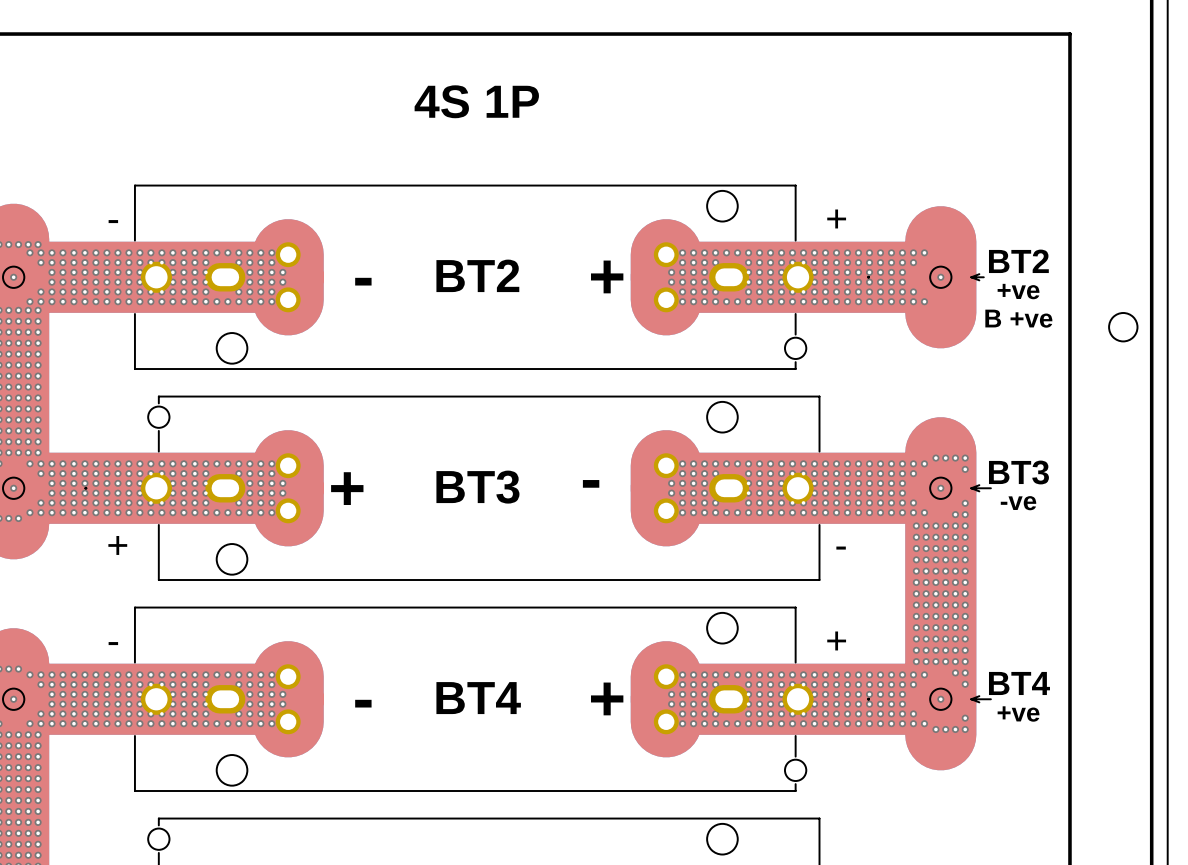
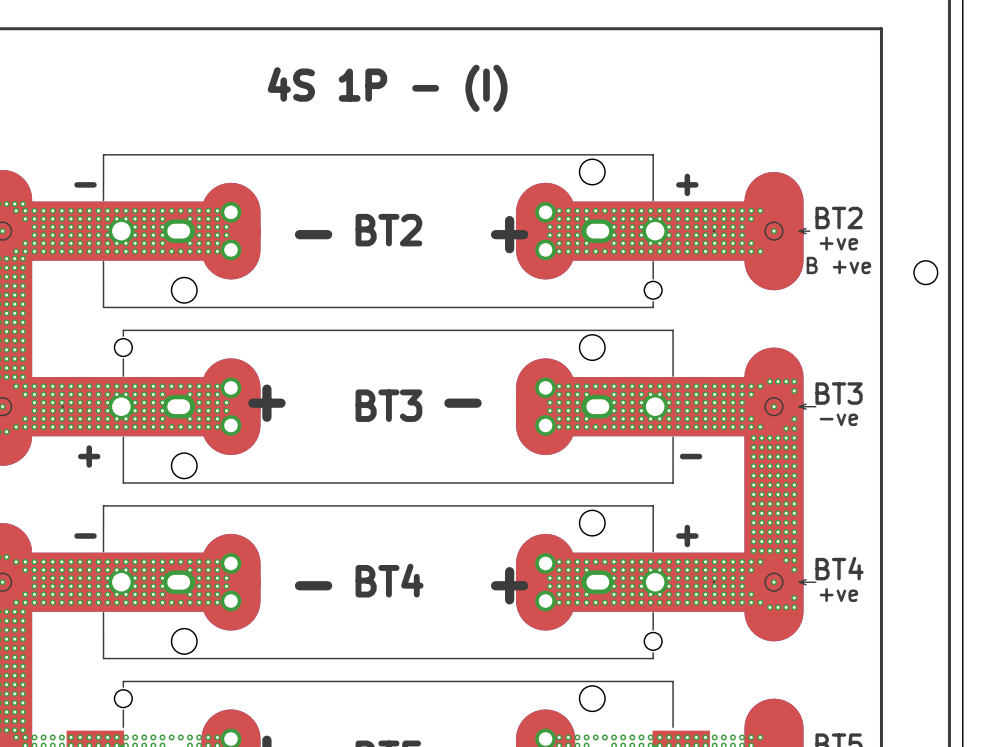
text: 4S 1P (476, 101) -> 4S 1P - (I) (387, 88)

